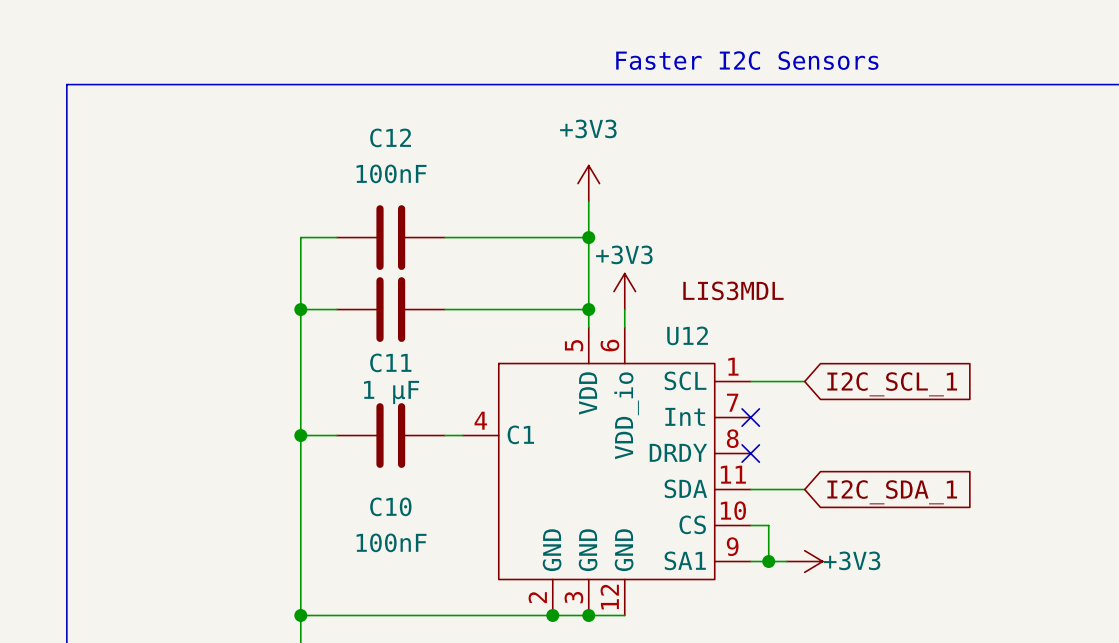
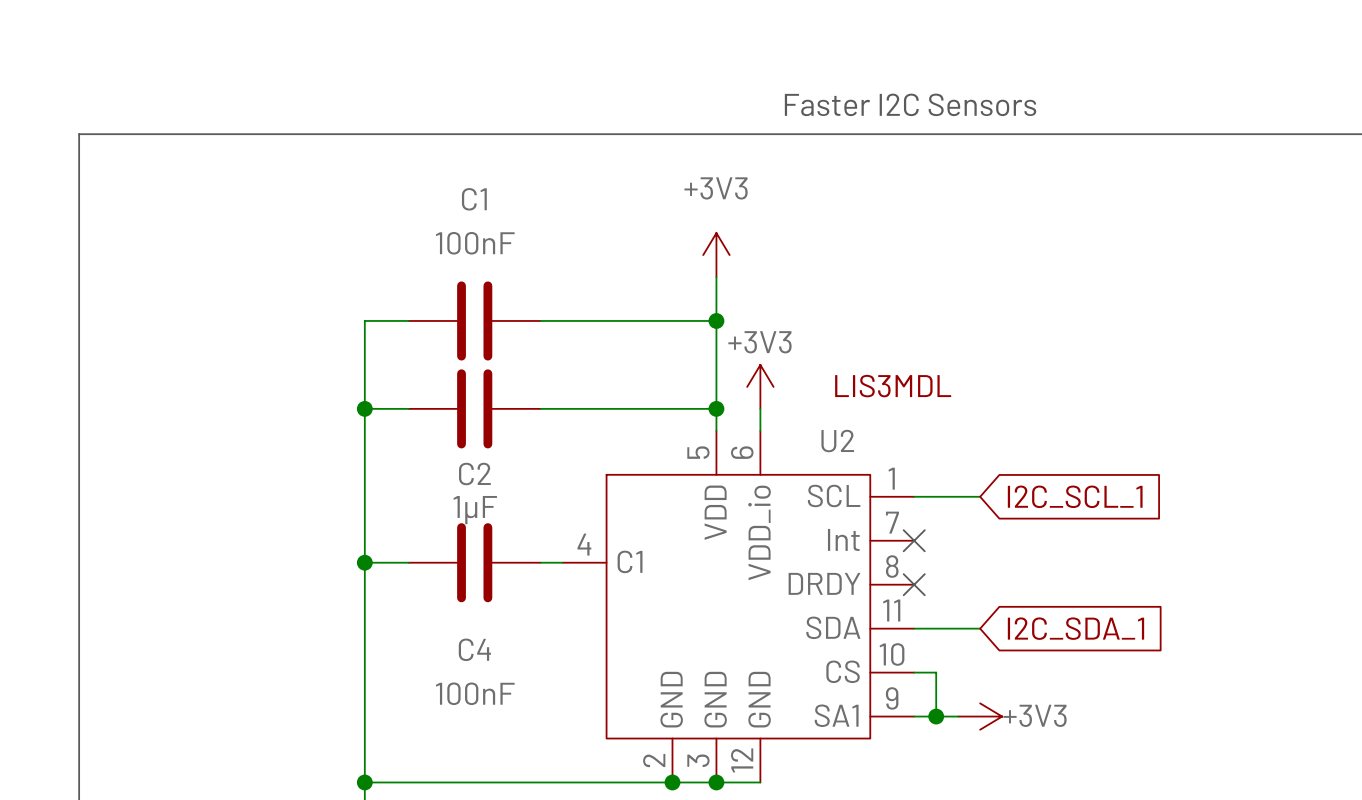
C12 name: C12 (390, 137) -> C1 (474, 199)
U12 name: U12 (687, 335) -> U2 (837, 441)
C11 name: C11 (390, 362) -> C2 (474, 474)
C11 value: 1 µF (391, 392) -> 1µF (475, 510)
C10 name: C10 (390, 506) -> C4 (474, 649)

